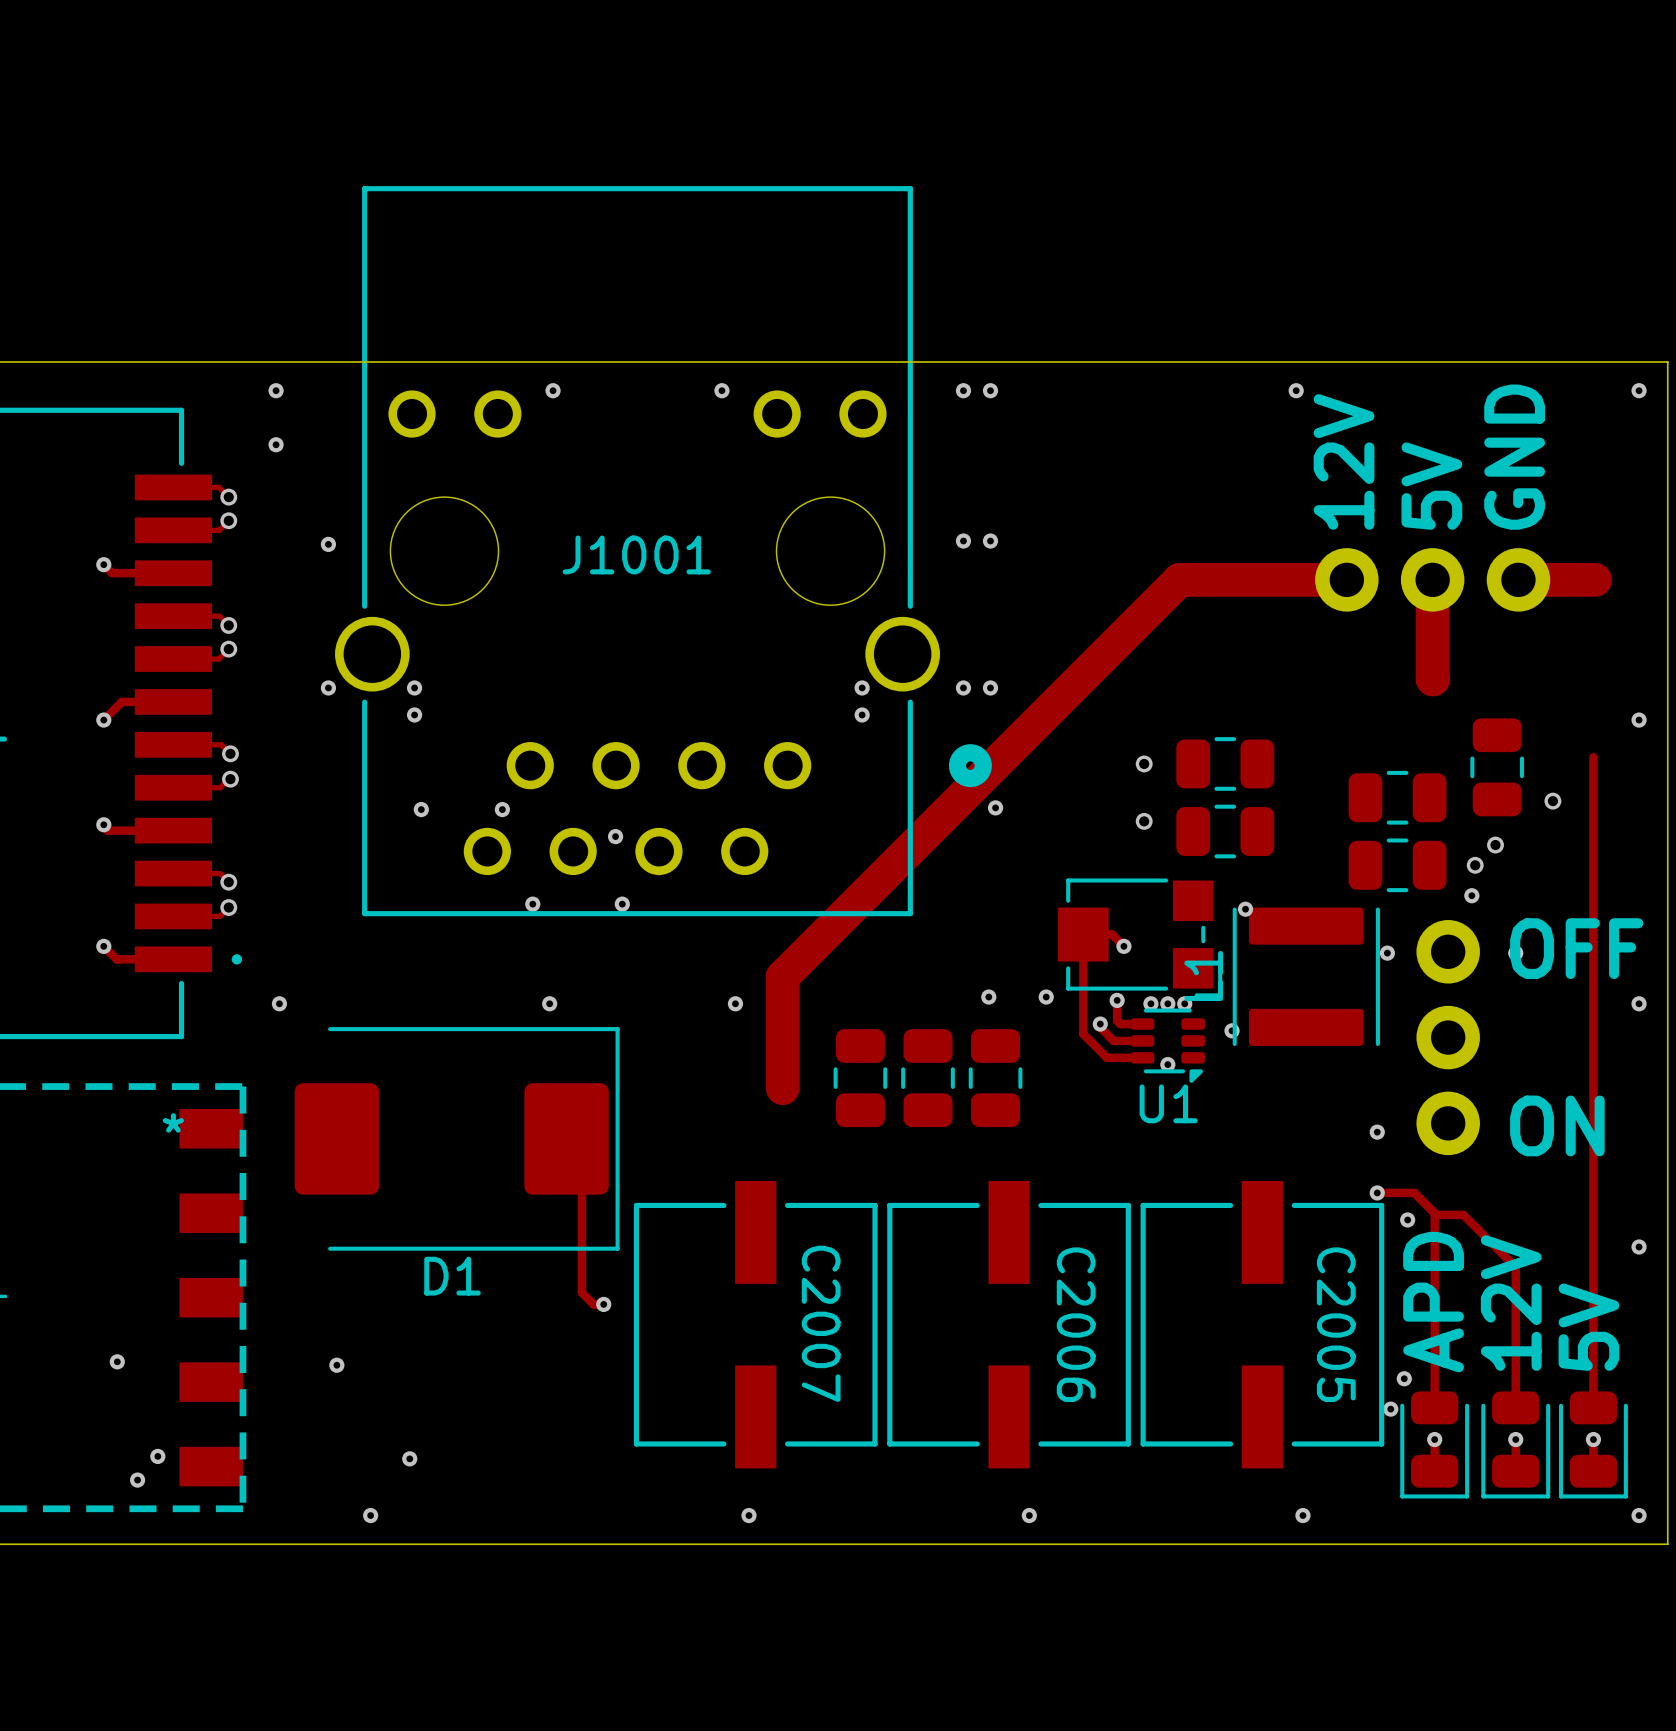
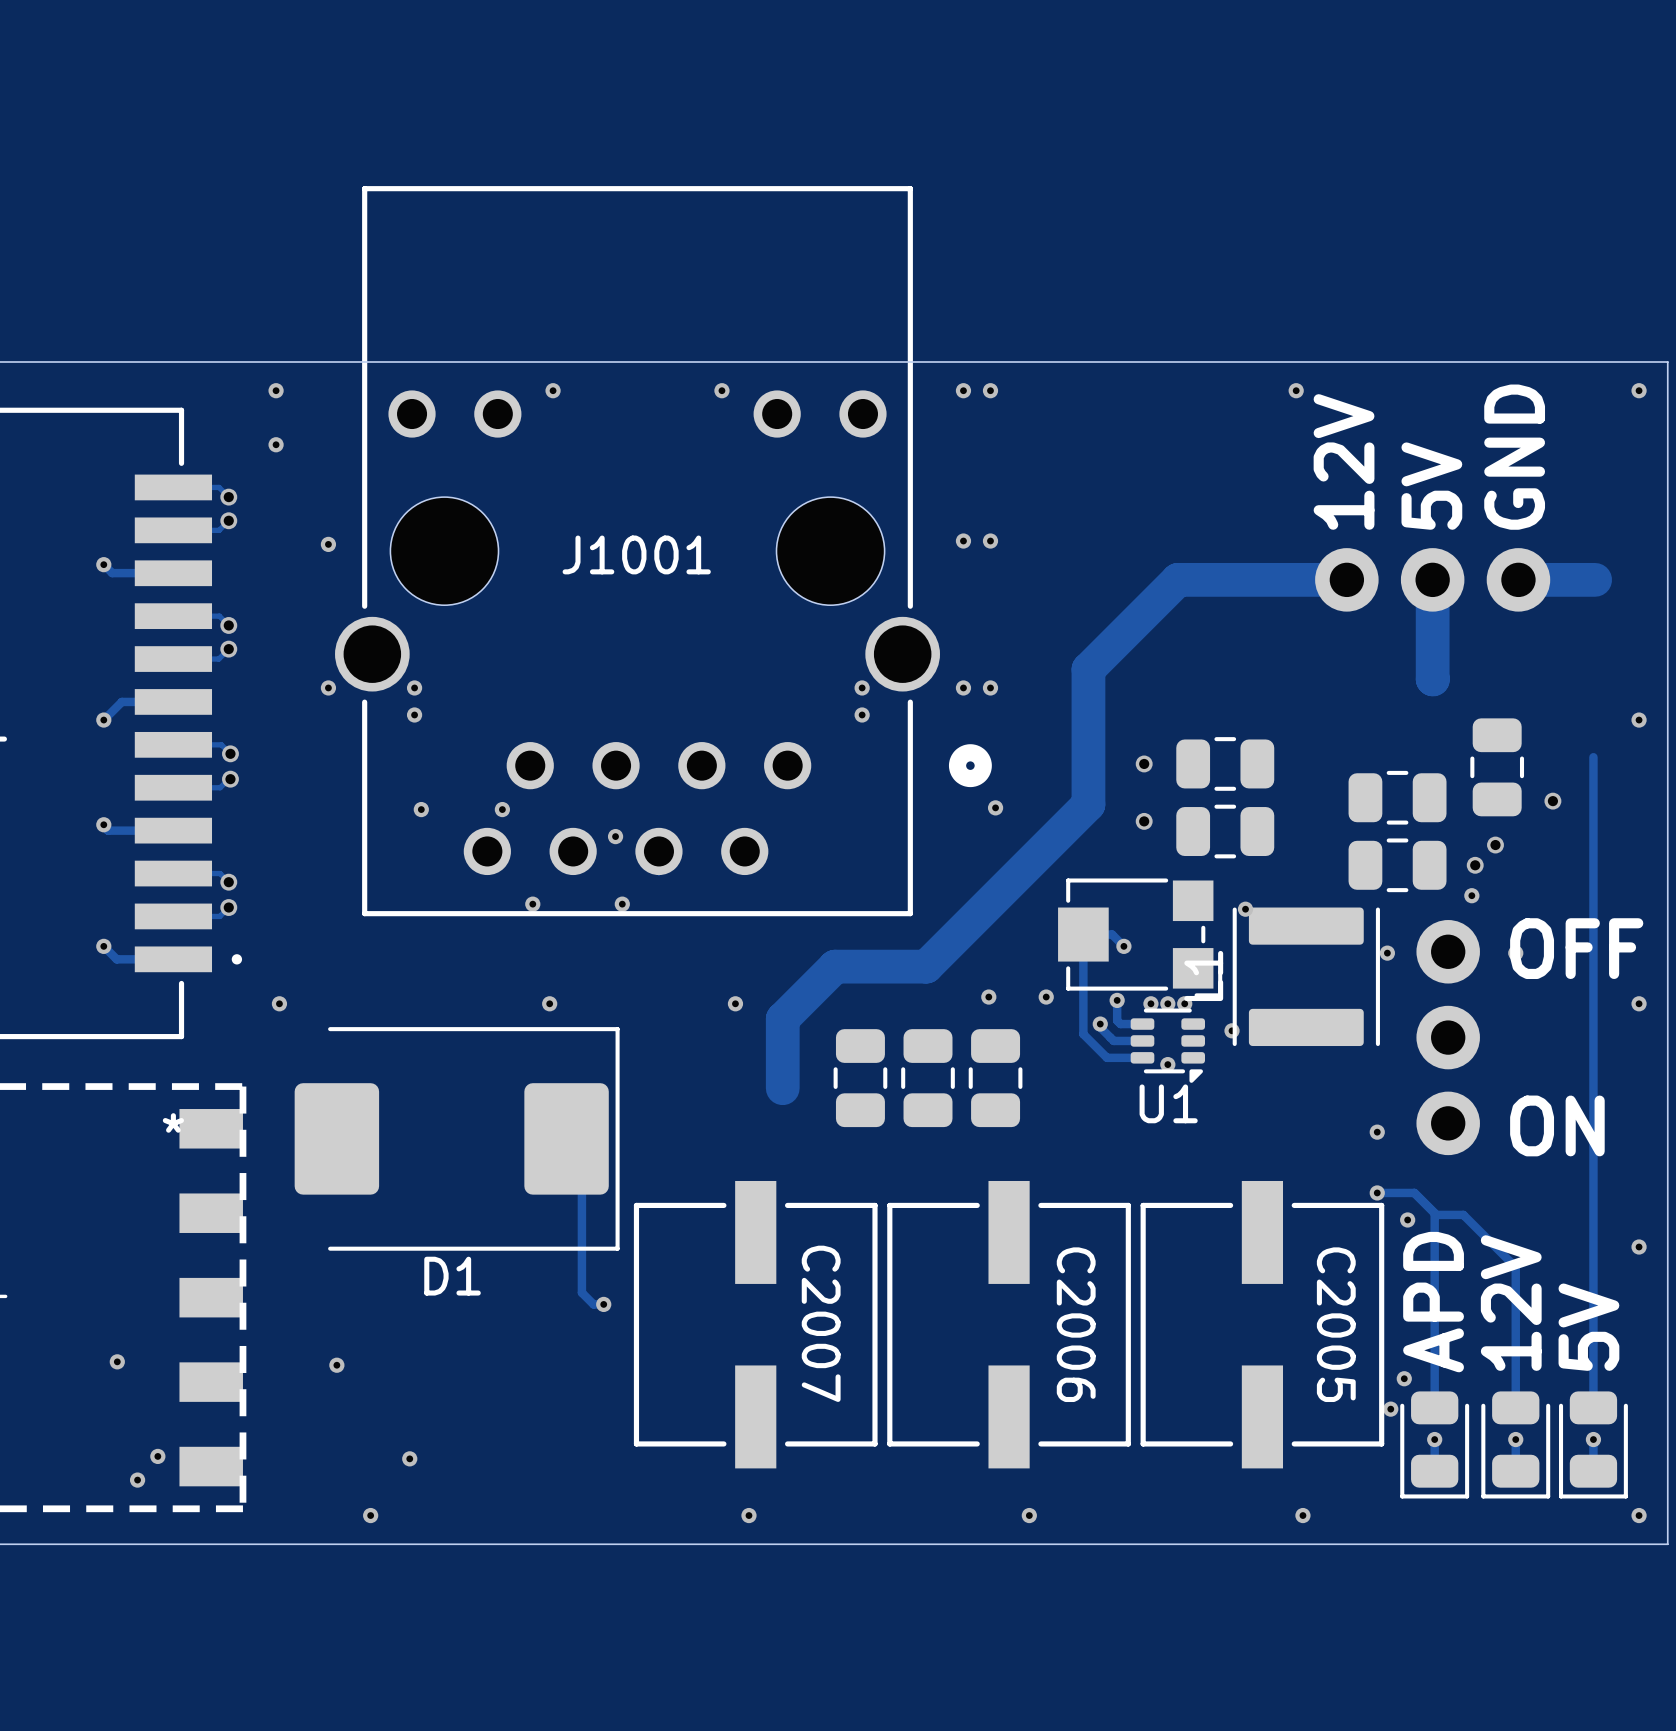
track: (1179, 579) (782, 976) (782, 1018) -> (1179, 579) (1088, 669) (1088, 804) (926, 966) (835, 966) (782, 1018)

